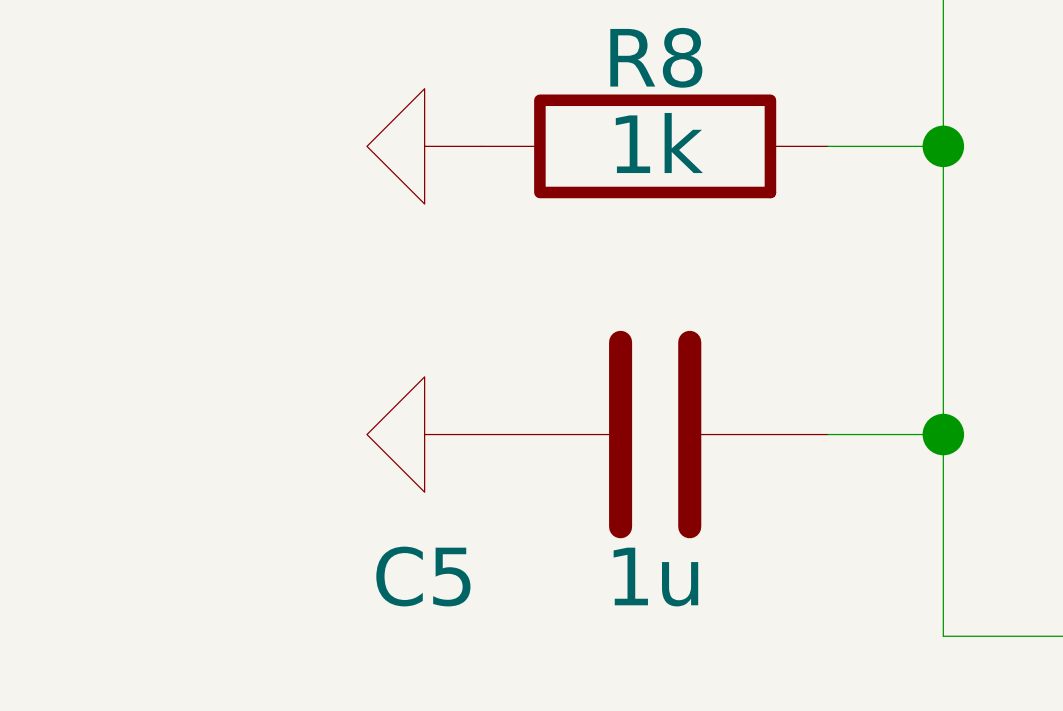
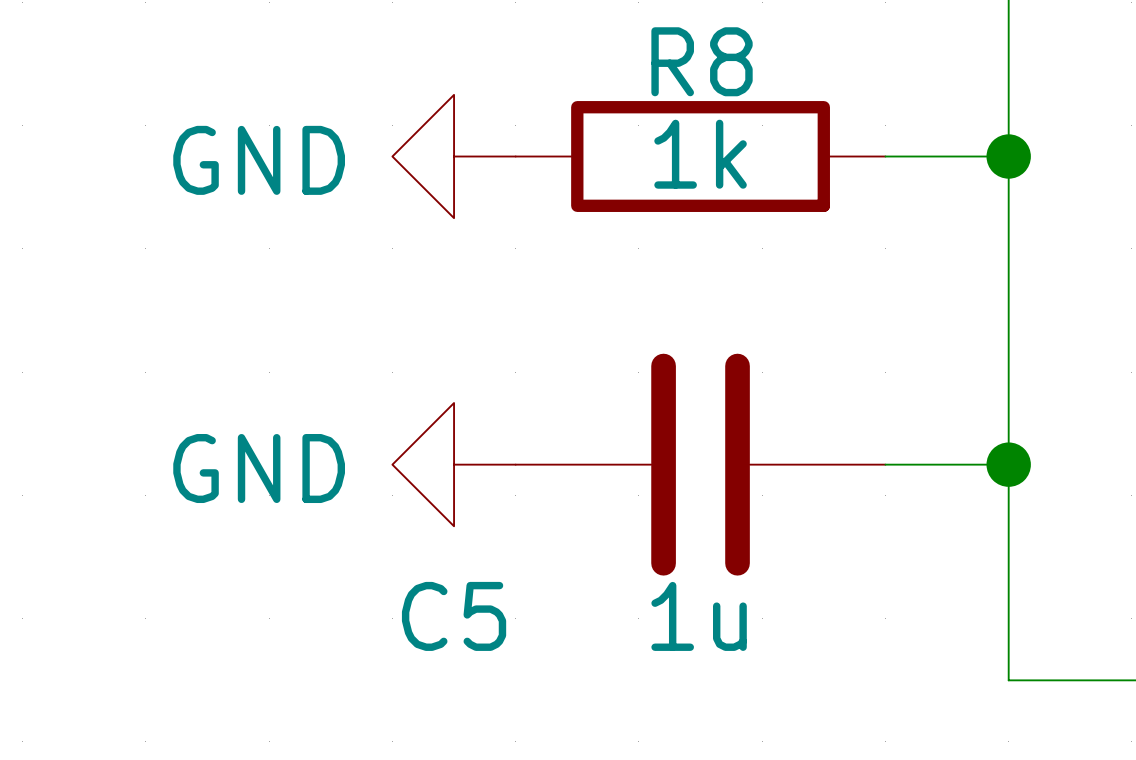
power symbol text: none -> GND (259, 160)
power symbol text: none -> GND (259, 468)

